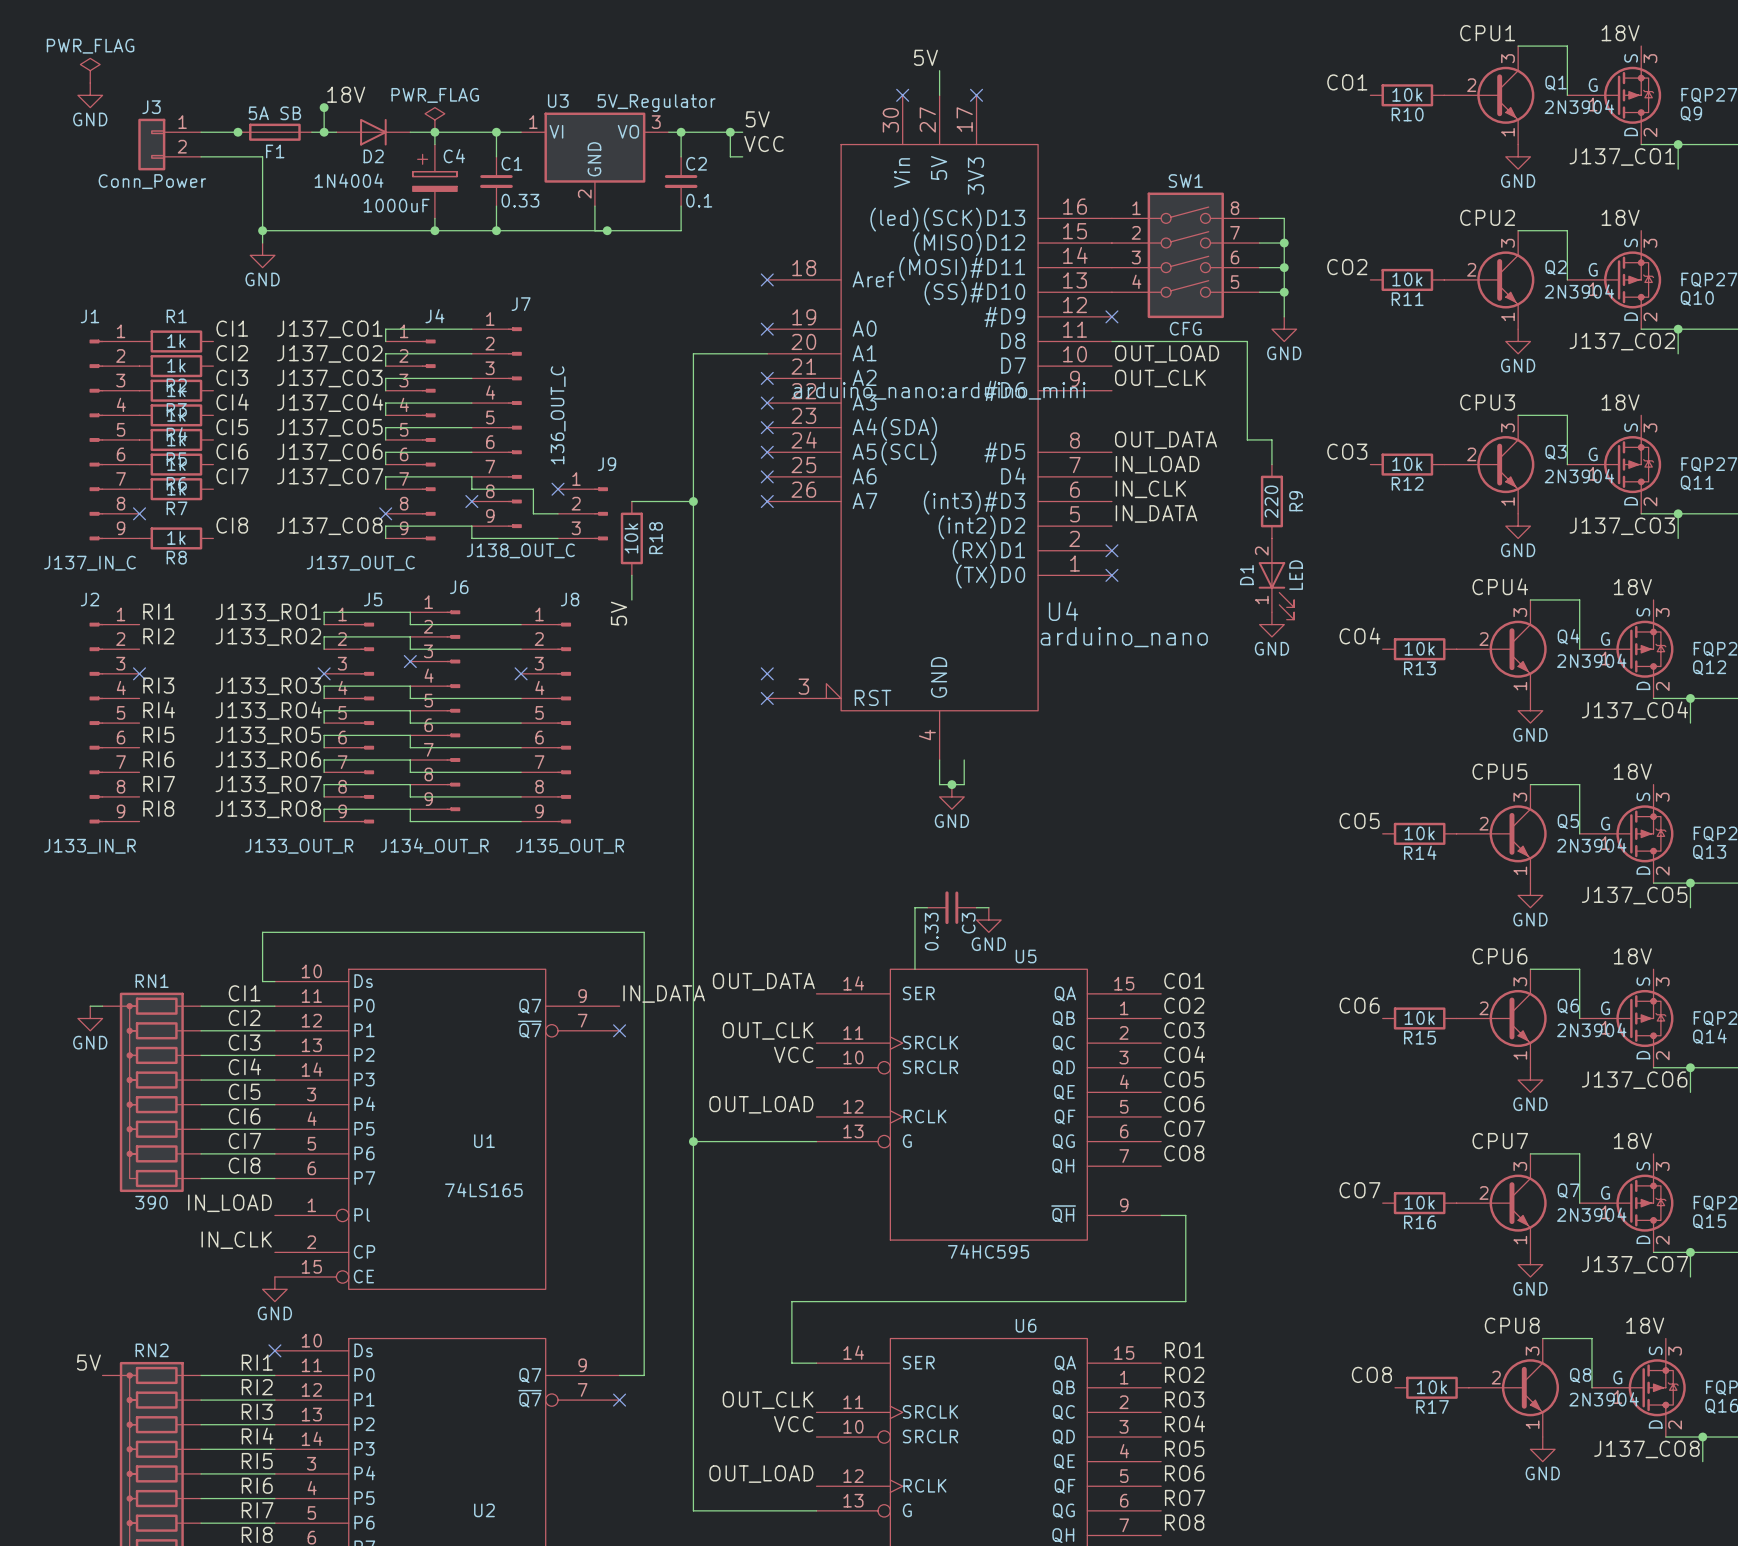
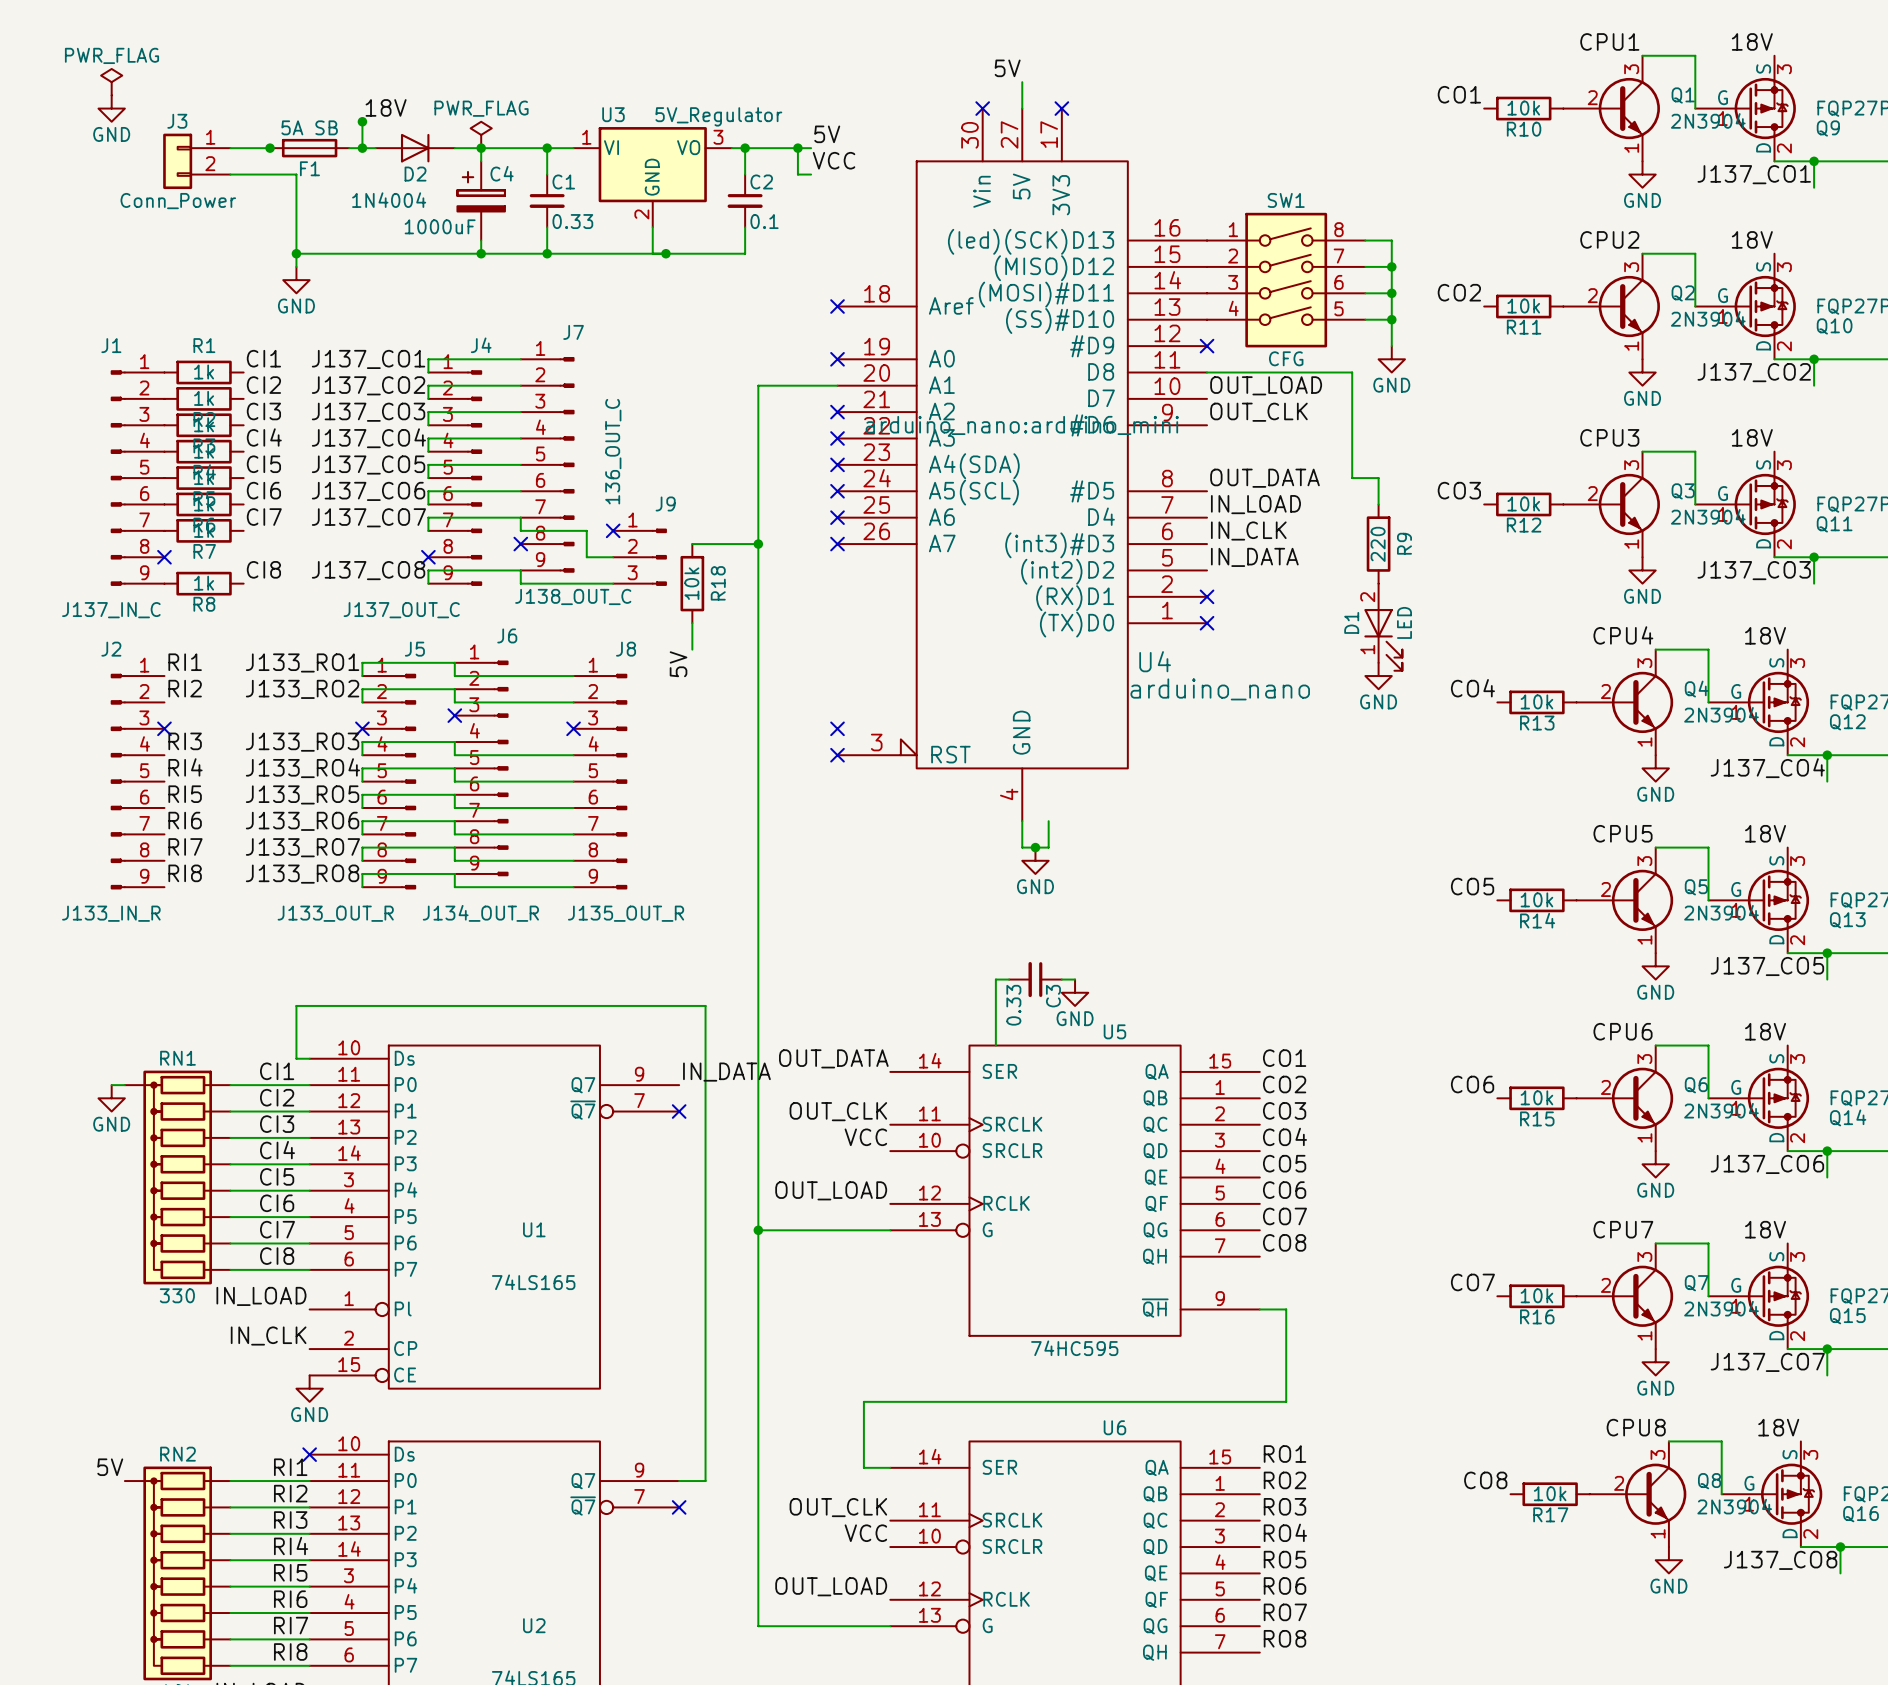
RN1 value: 390 (151, 1202) -> 330 (177, 1295)

